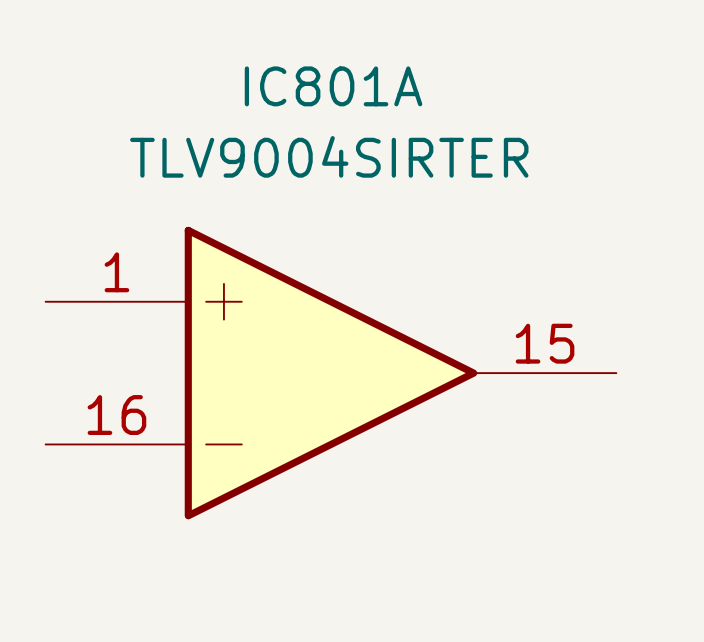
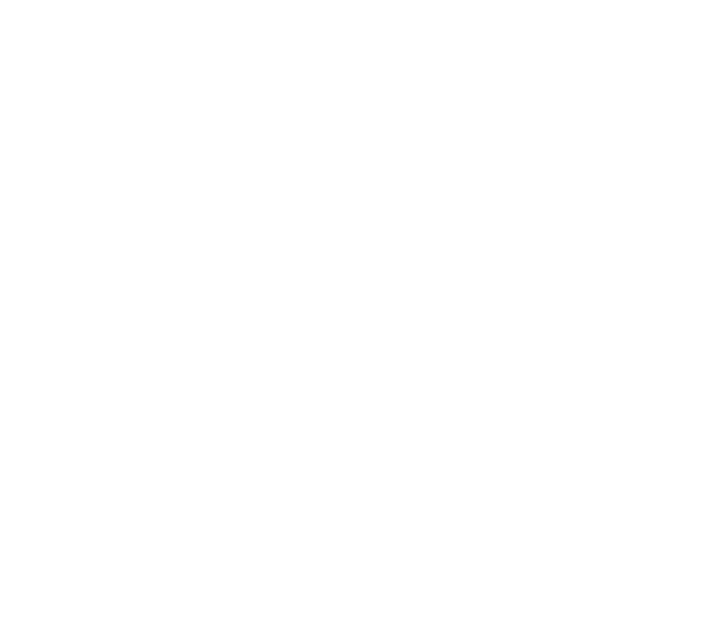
IC801A: TLV9004SIRTER (330, 373) -> none

